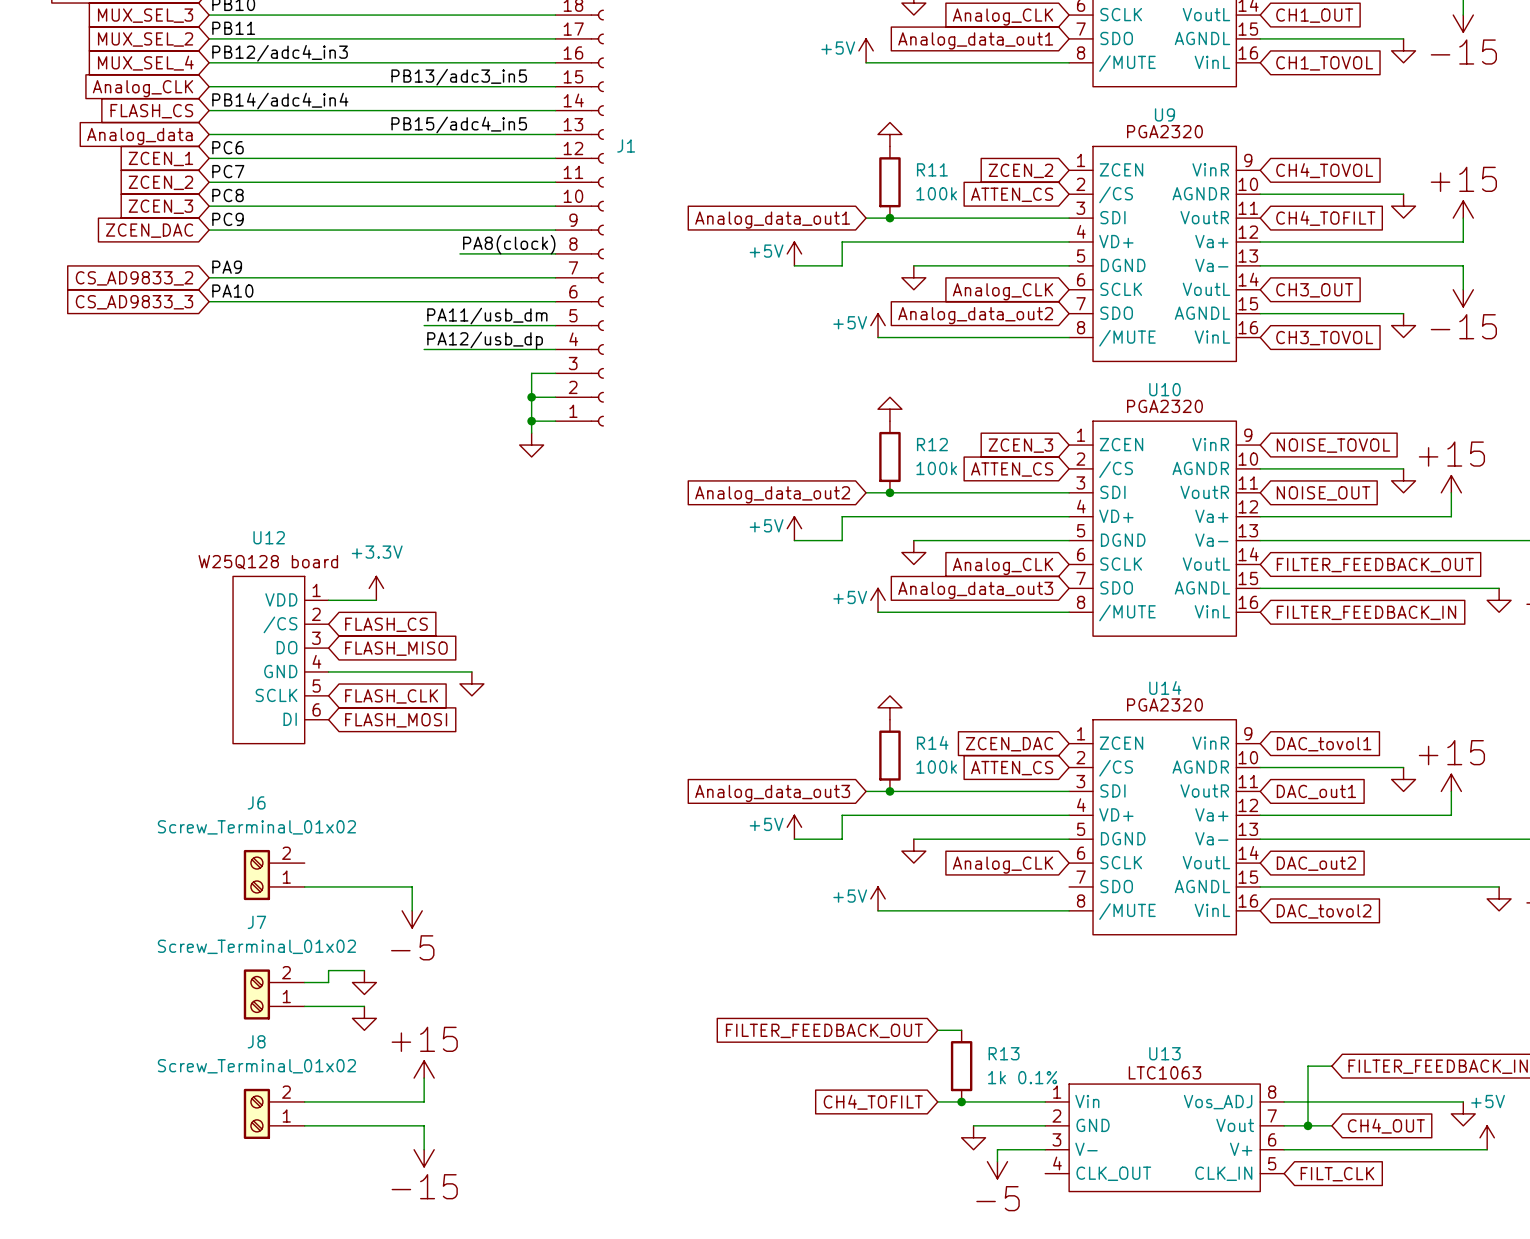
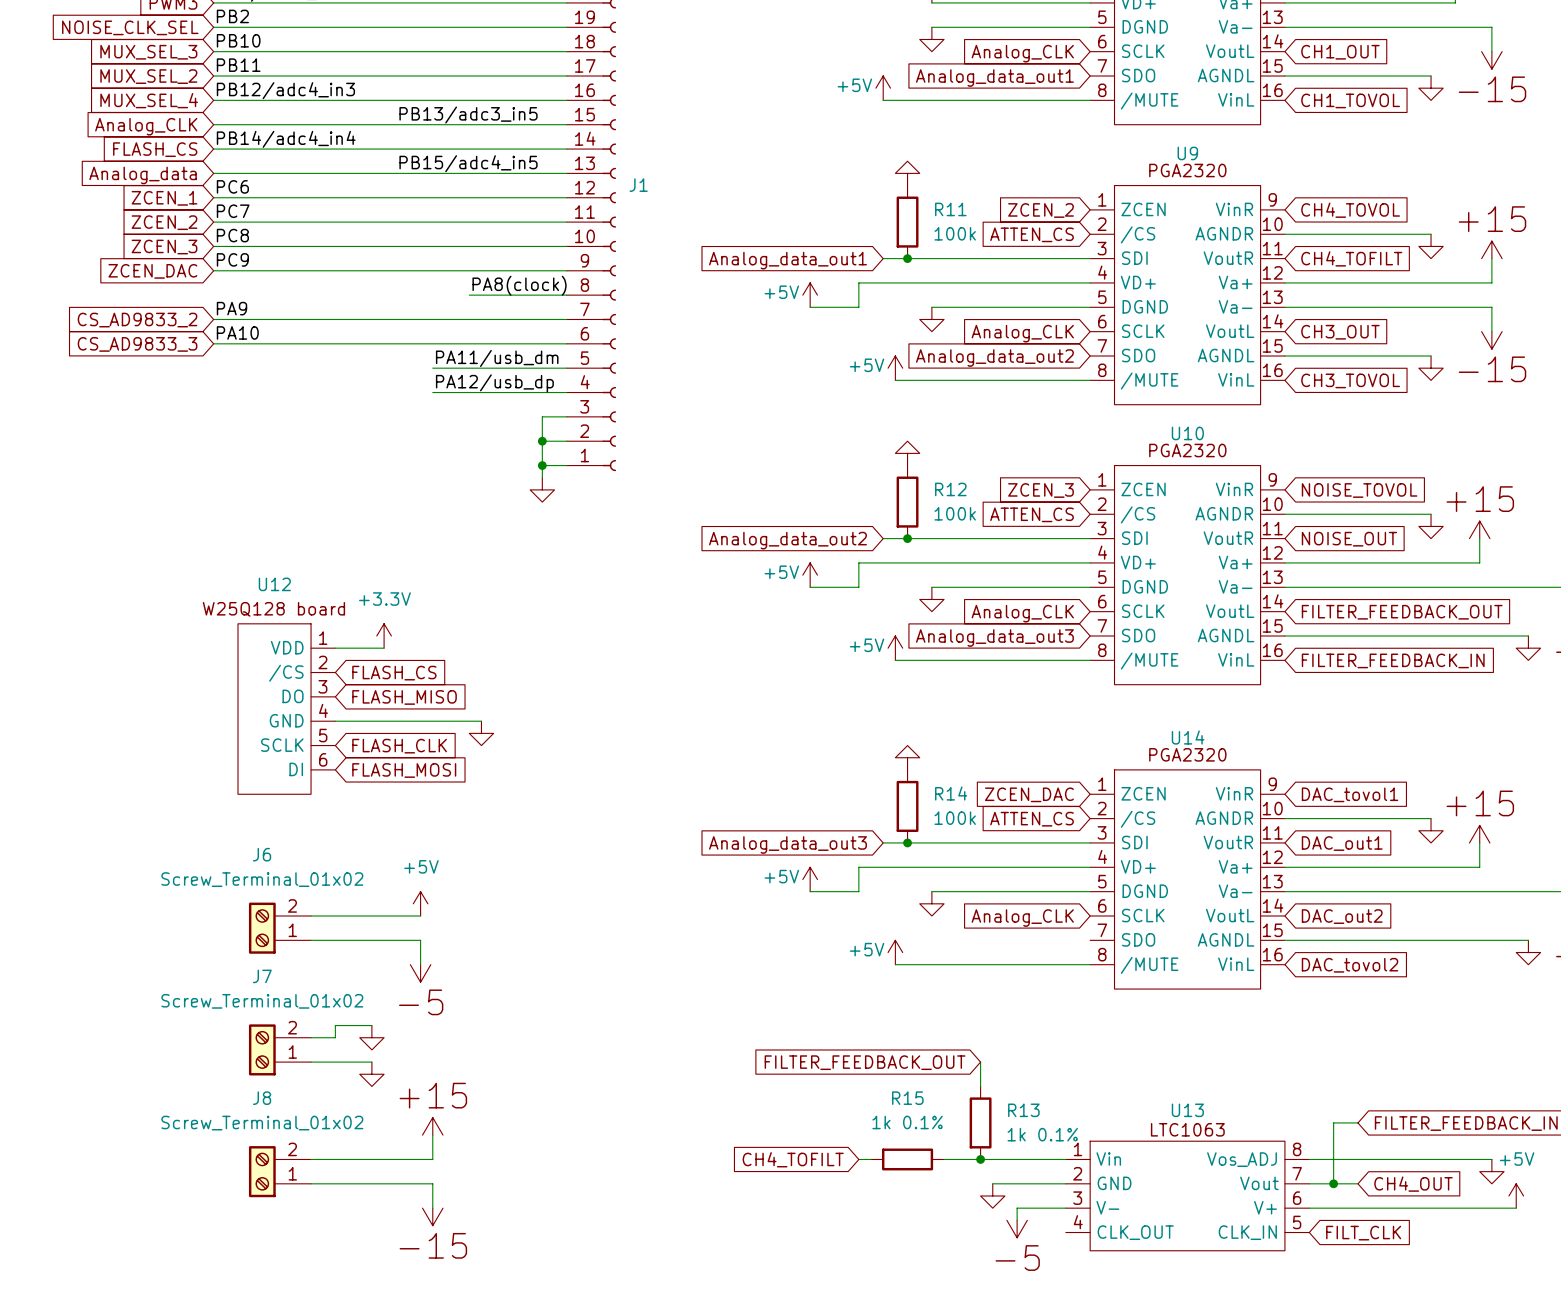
power symbol: none -> +5V (420, 903)
wire: none -> (311, 915) (420, 915)
global label position: FILTER_FEEDBACK_OUT (824, 1030) -> FILTER_FEEDBACK_OUT (865, 1062)
wire: (937, 1030) (961, 1030) -> (980, 1062) (980, 1086)
wire: none -> (858, 1159) (871, 1159)
R15: none -> (907, 1159)
wire: none -> (944, 1159) (956, 1159)
global label position: CH4_TOFILT (873, 1102) -> CH4_TOFILT (793, 1159)

